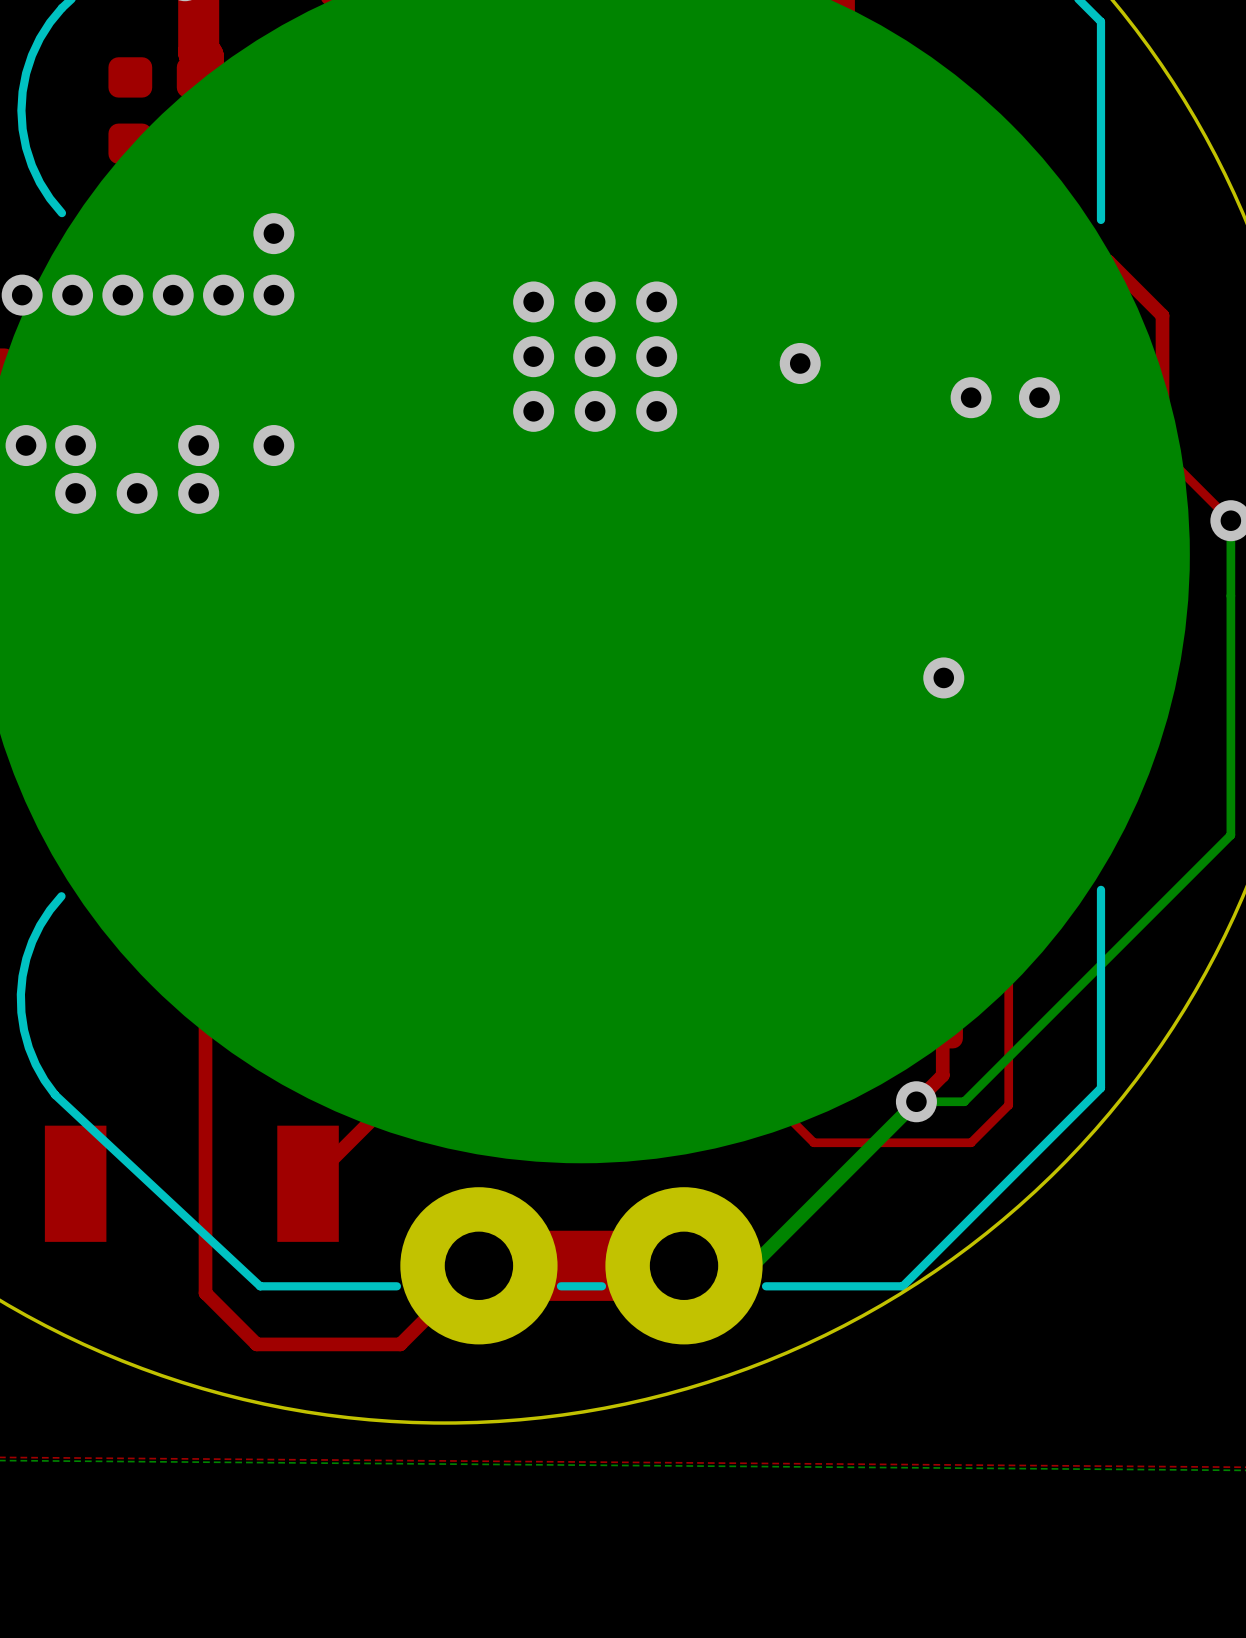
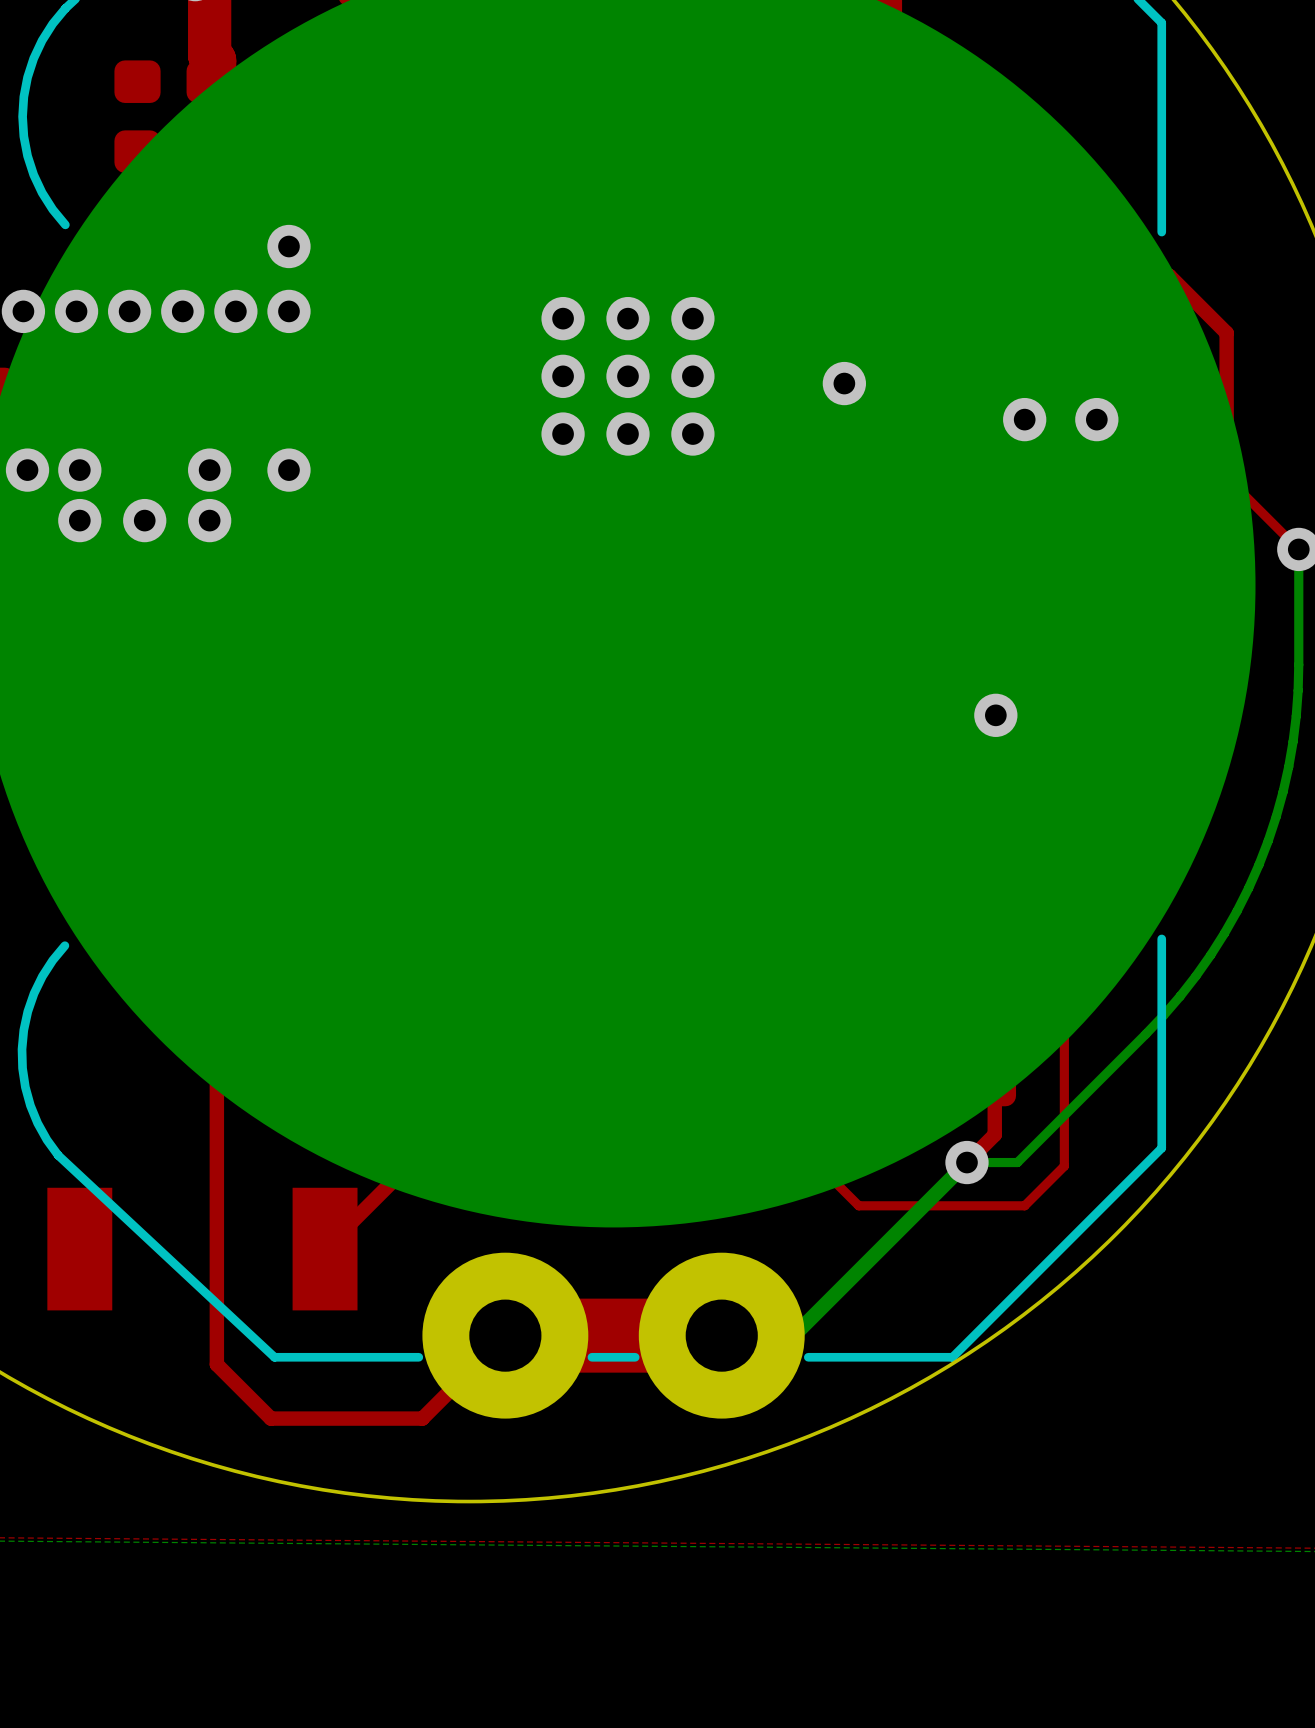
bottom track: (1230, 630) (1230, 835) (1085, 980) -> (1298, 664) (1296, 716) (1288, 766) (1276, 816) (1259, 864) (1237, 911) (1210, 955) (1180, 996) (1145, 1034)

